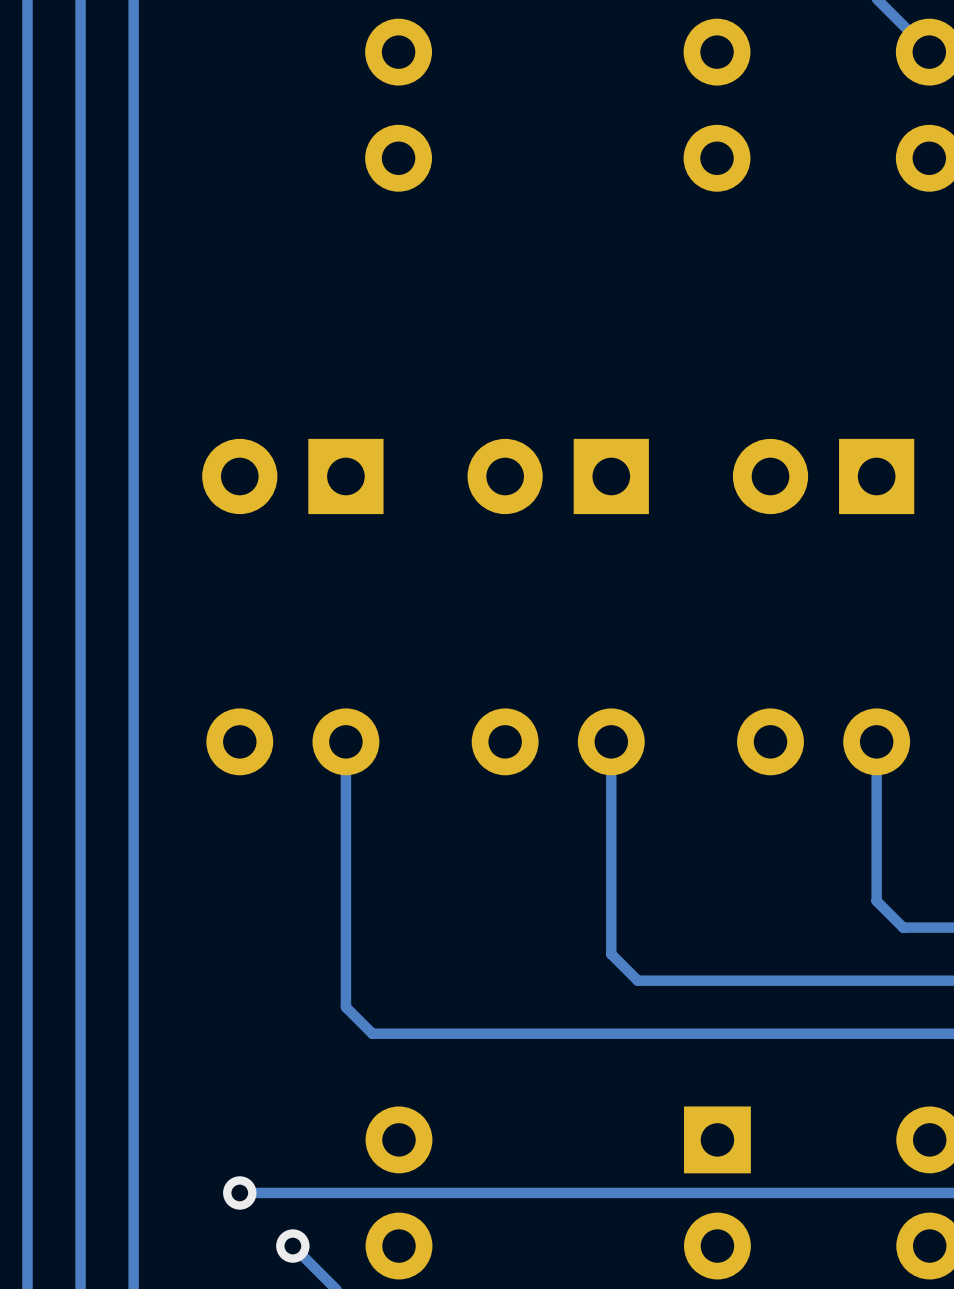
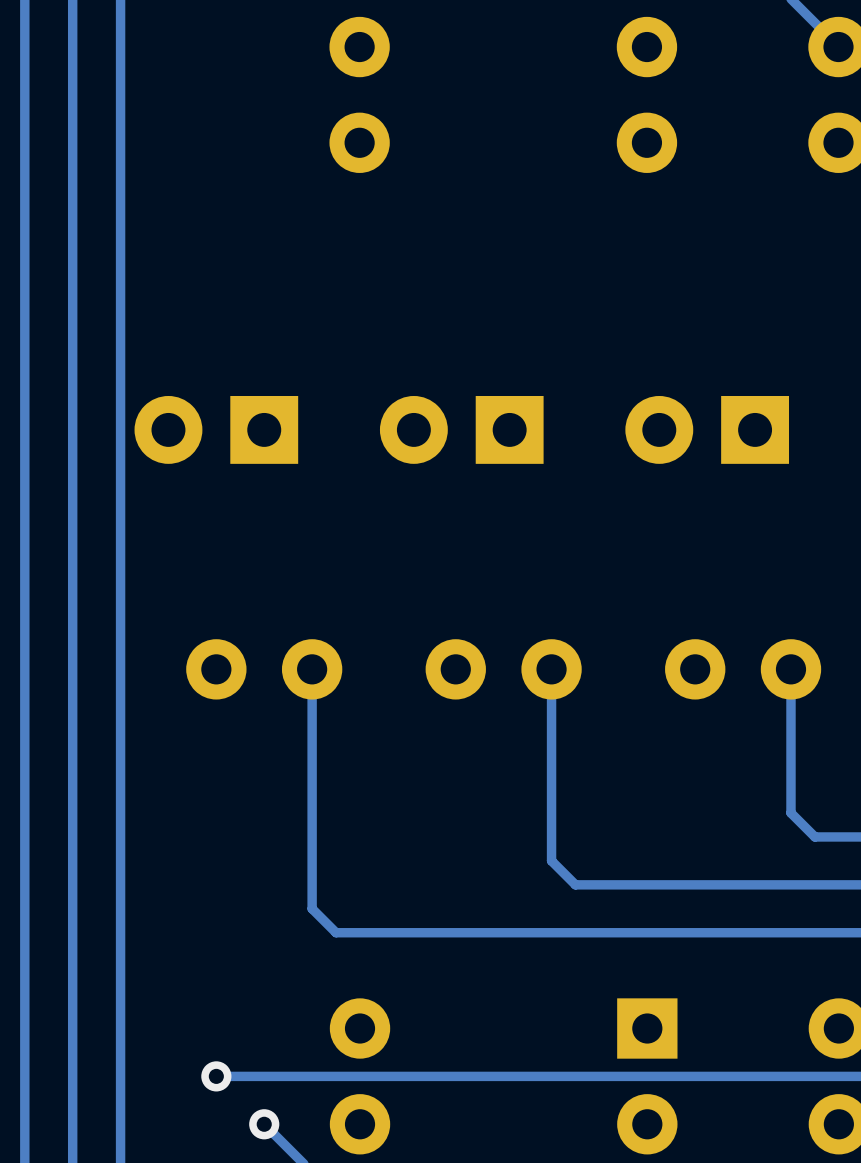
part position: (292, 476) -> (216, 429)
part position: (558, 476) -> (461, 429)
part position: (823, 476) -> (707, 429)

